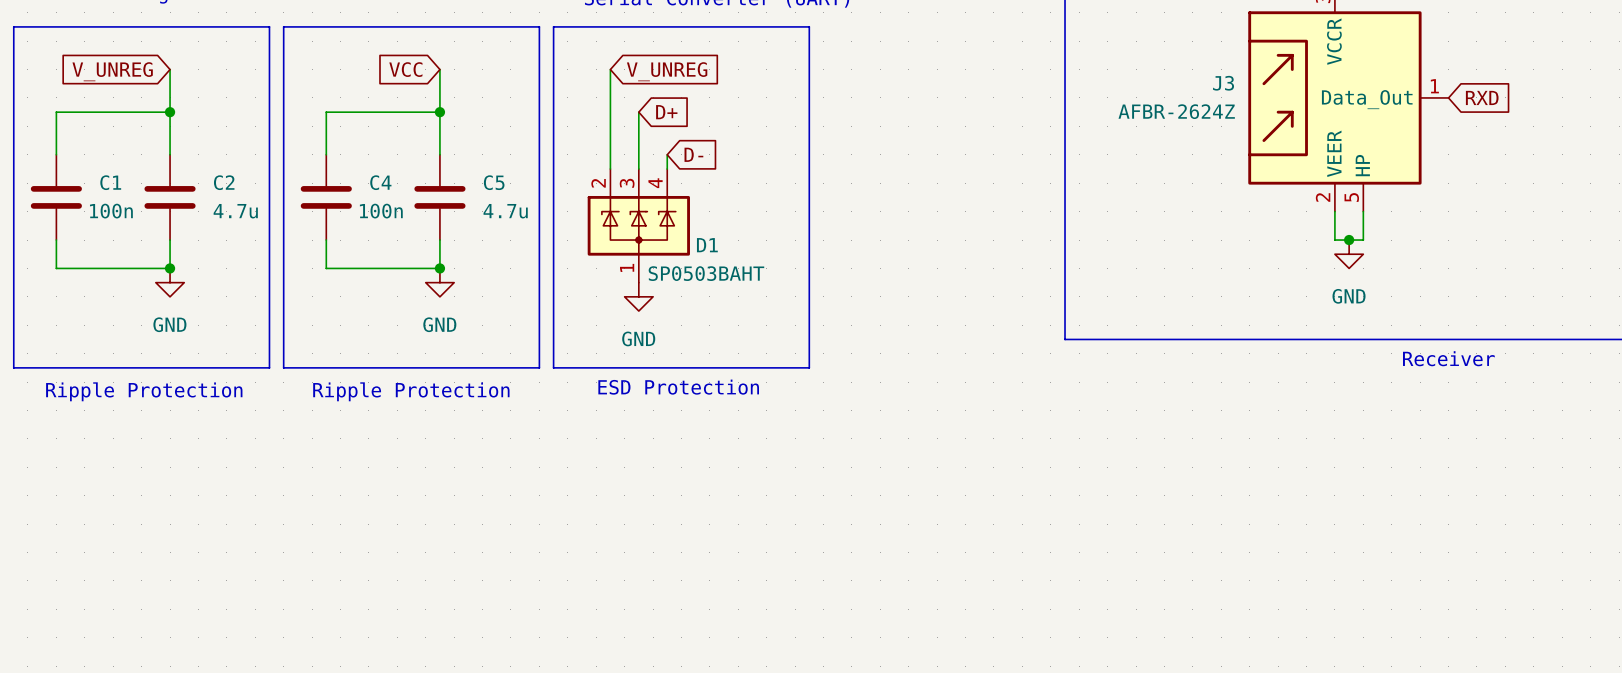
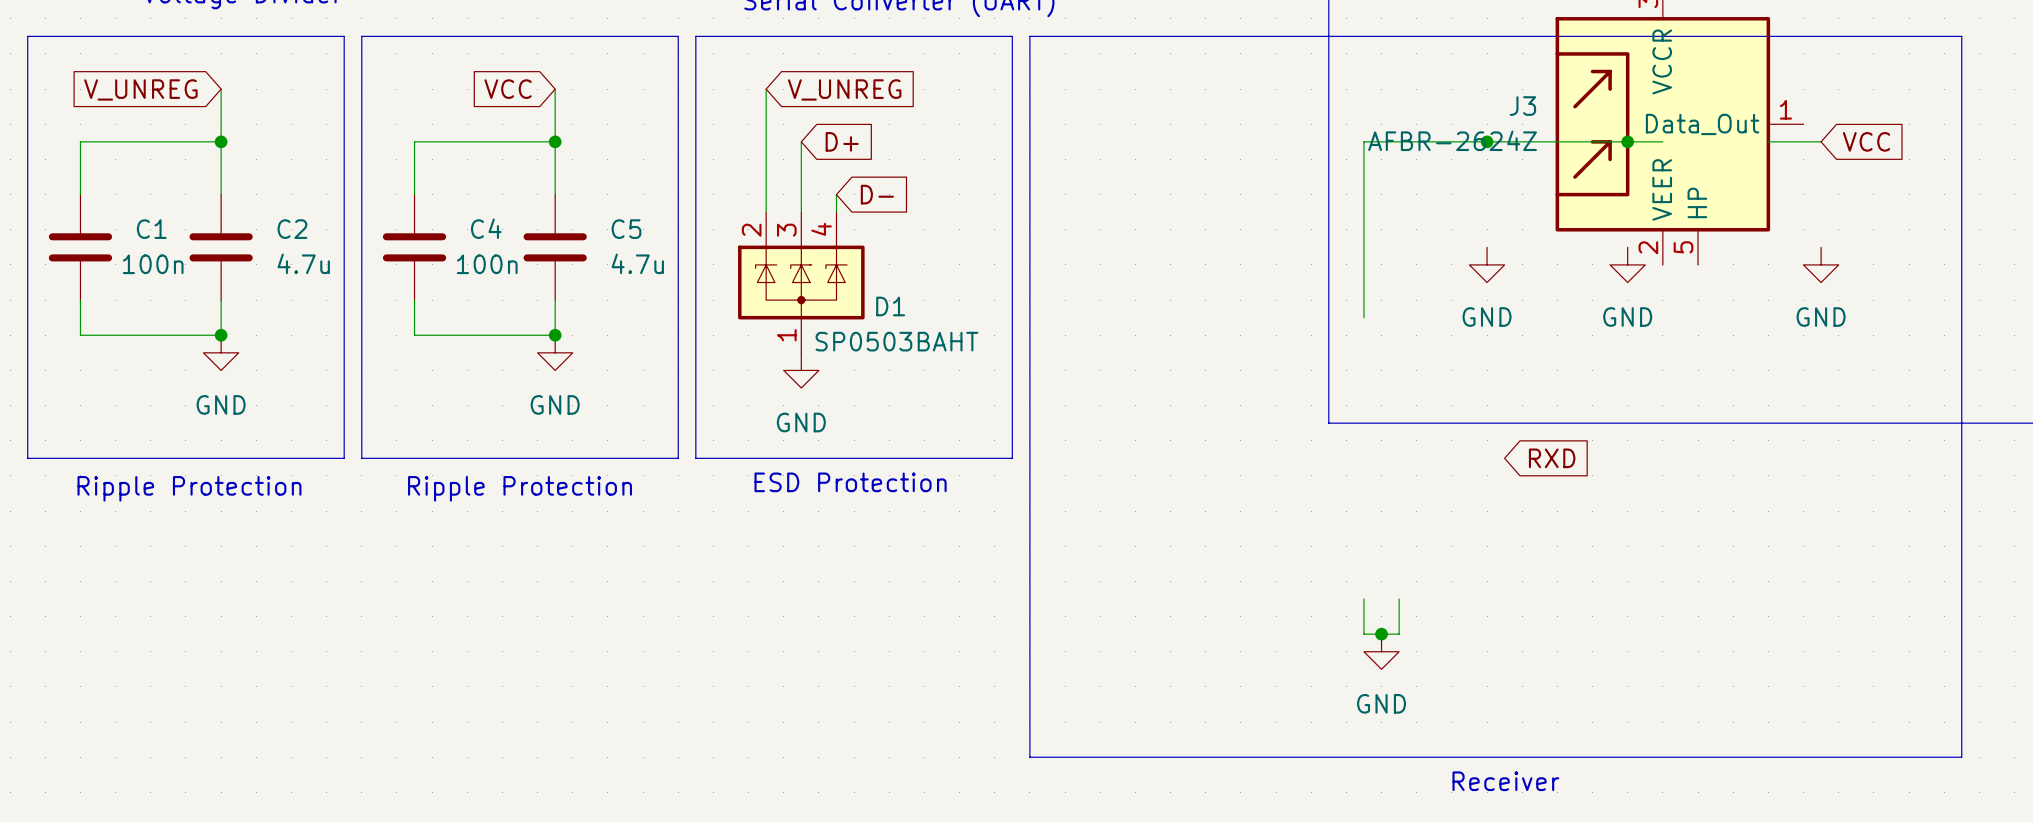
line: none -> (1029, 36) (1029, 757) (1961, 757) (1961, 36) (1029, 36)
global label: RXD (1482, 97) -> none
junction: none -> (1487, 141)
junction: none -> (1627, 141)
wire: none -> (1662, 141) (1363, 141) (1363, 317)
wire: none -> (1768, 141) (1821, 141)
global label: none -> VCC (1866, 141)
power symbol: none -> GND (1487, 264)
wire: (1334, 211) (1334, 240) (1363, 240) (1363, 211) -> none
power symbol: none -> GND (1821, 264)
junction: (1349, 240) -> none
power symbol position: GND (1349, 254) -> GND (1627, 264)
text: Receiver (1448, 358) -> none
global label: none -> RXD (1552, 458)
wire: none -> (1363, 598) (1363, 634) (1399, 634) (1399, 598)
junction: none -> (1381, 634)
power symbol: none -> GND (1381, 651)
text: none -> Receiver (1505, 781)

